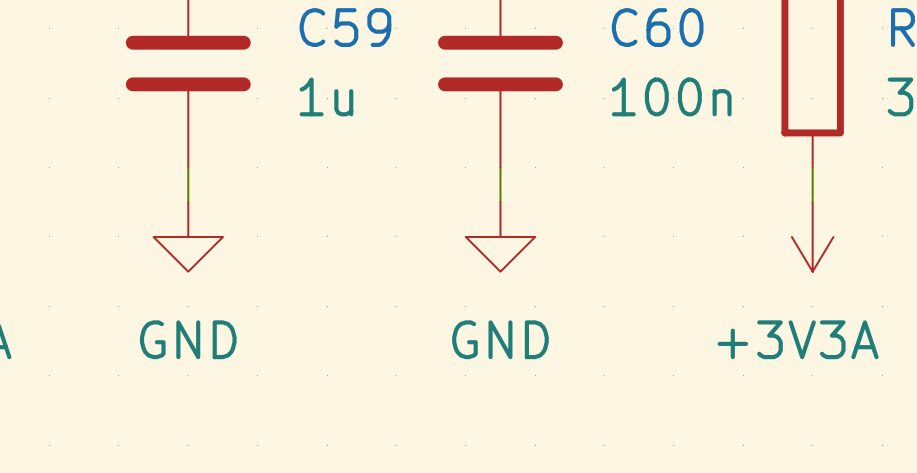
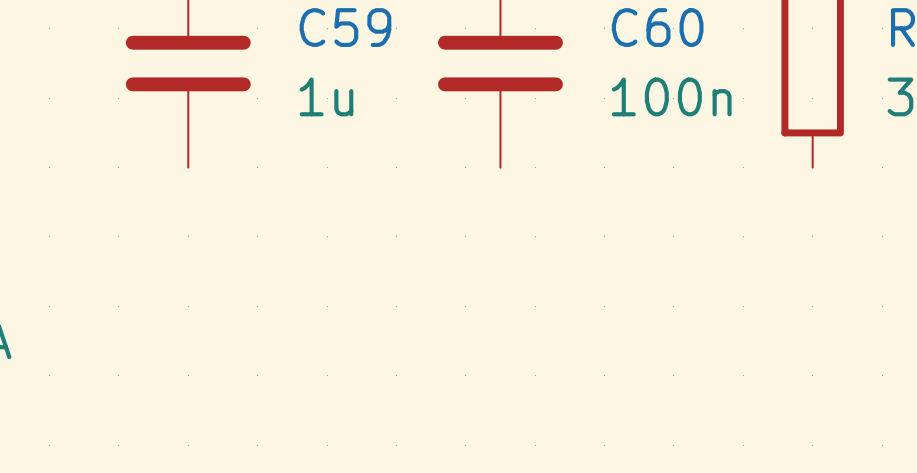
wire: (188, 167) (188, 202) -> none
wire: (500, 167) (500, 202) -> none
wire: (812, 167) (812, 202) -> none
power symbol: GND (188, 236) -> none
power symbol: GND (500, 236) -> none
power symbol: +3V3A (812, 236) -> none

